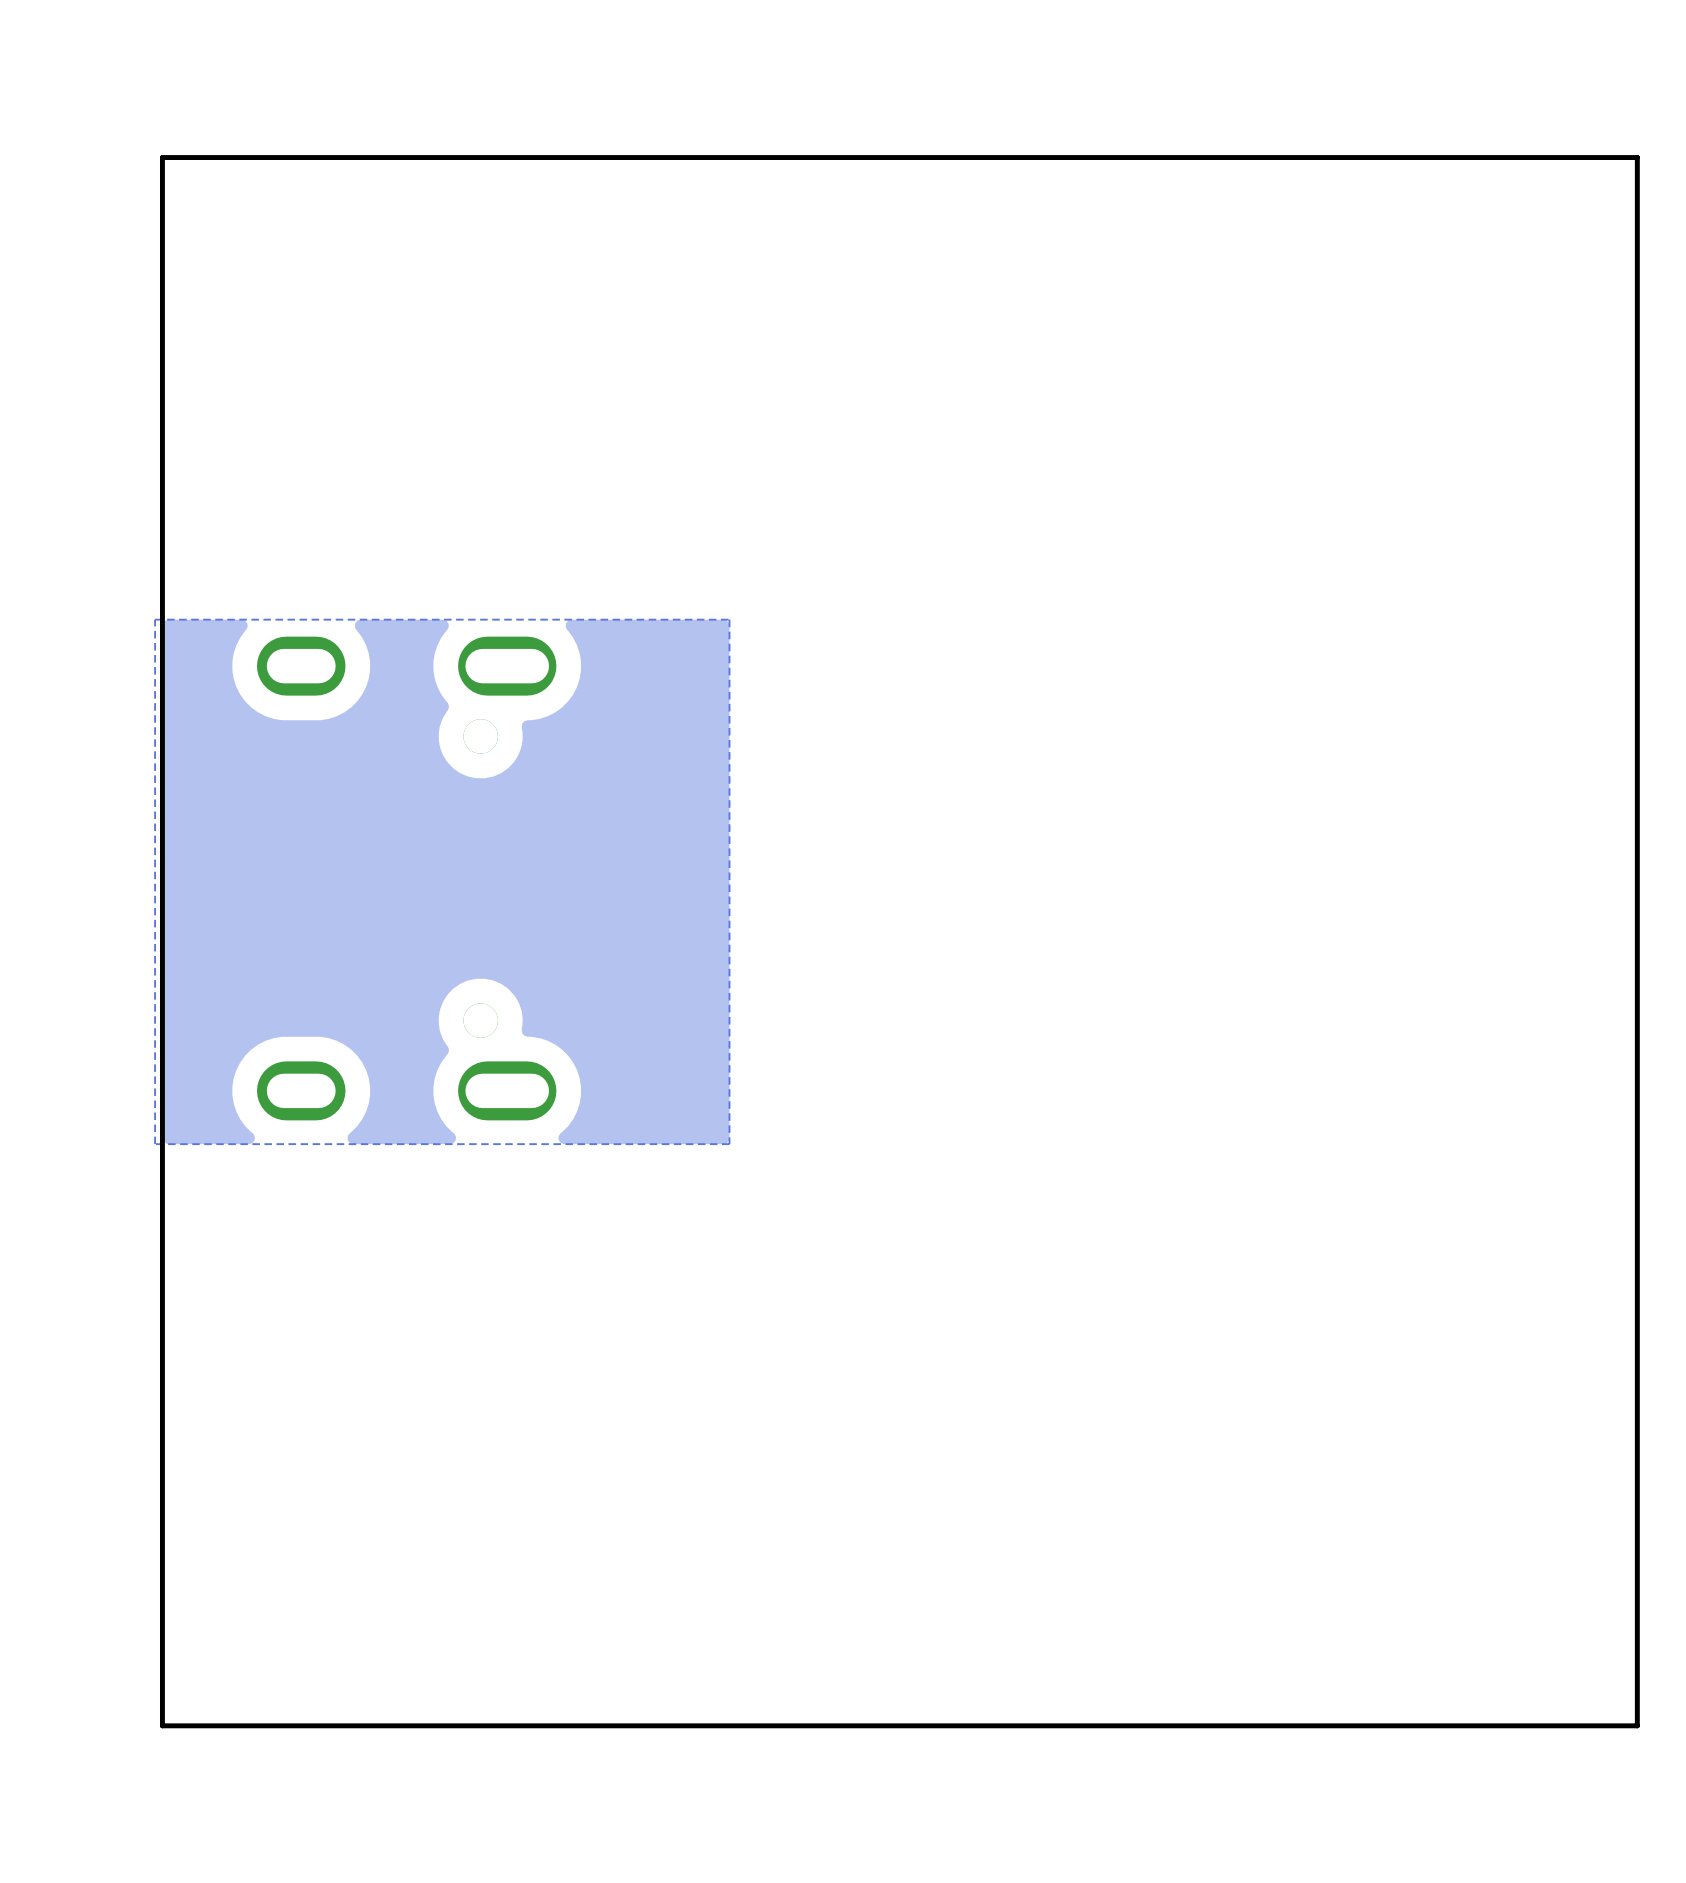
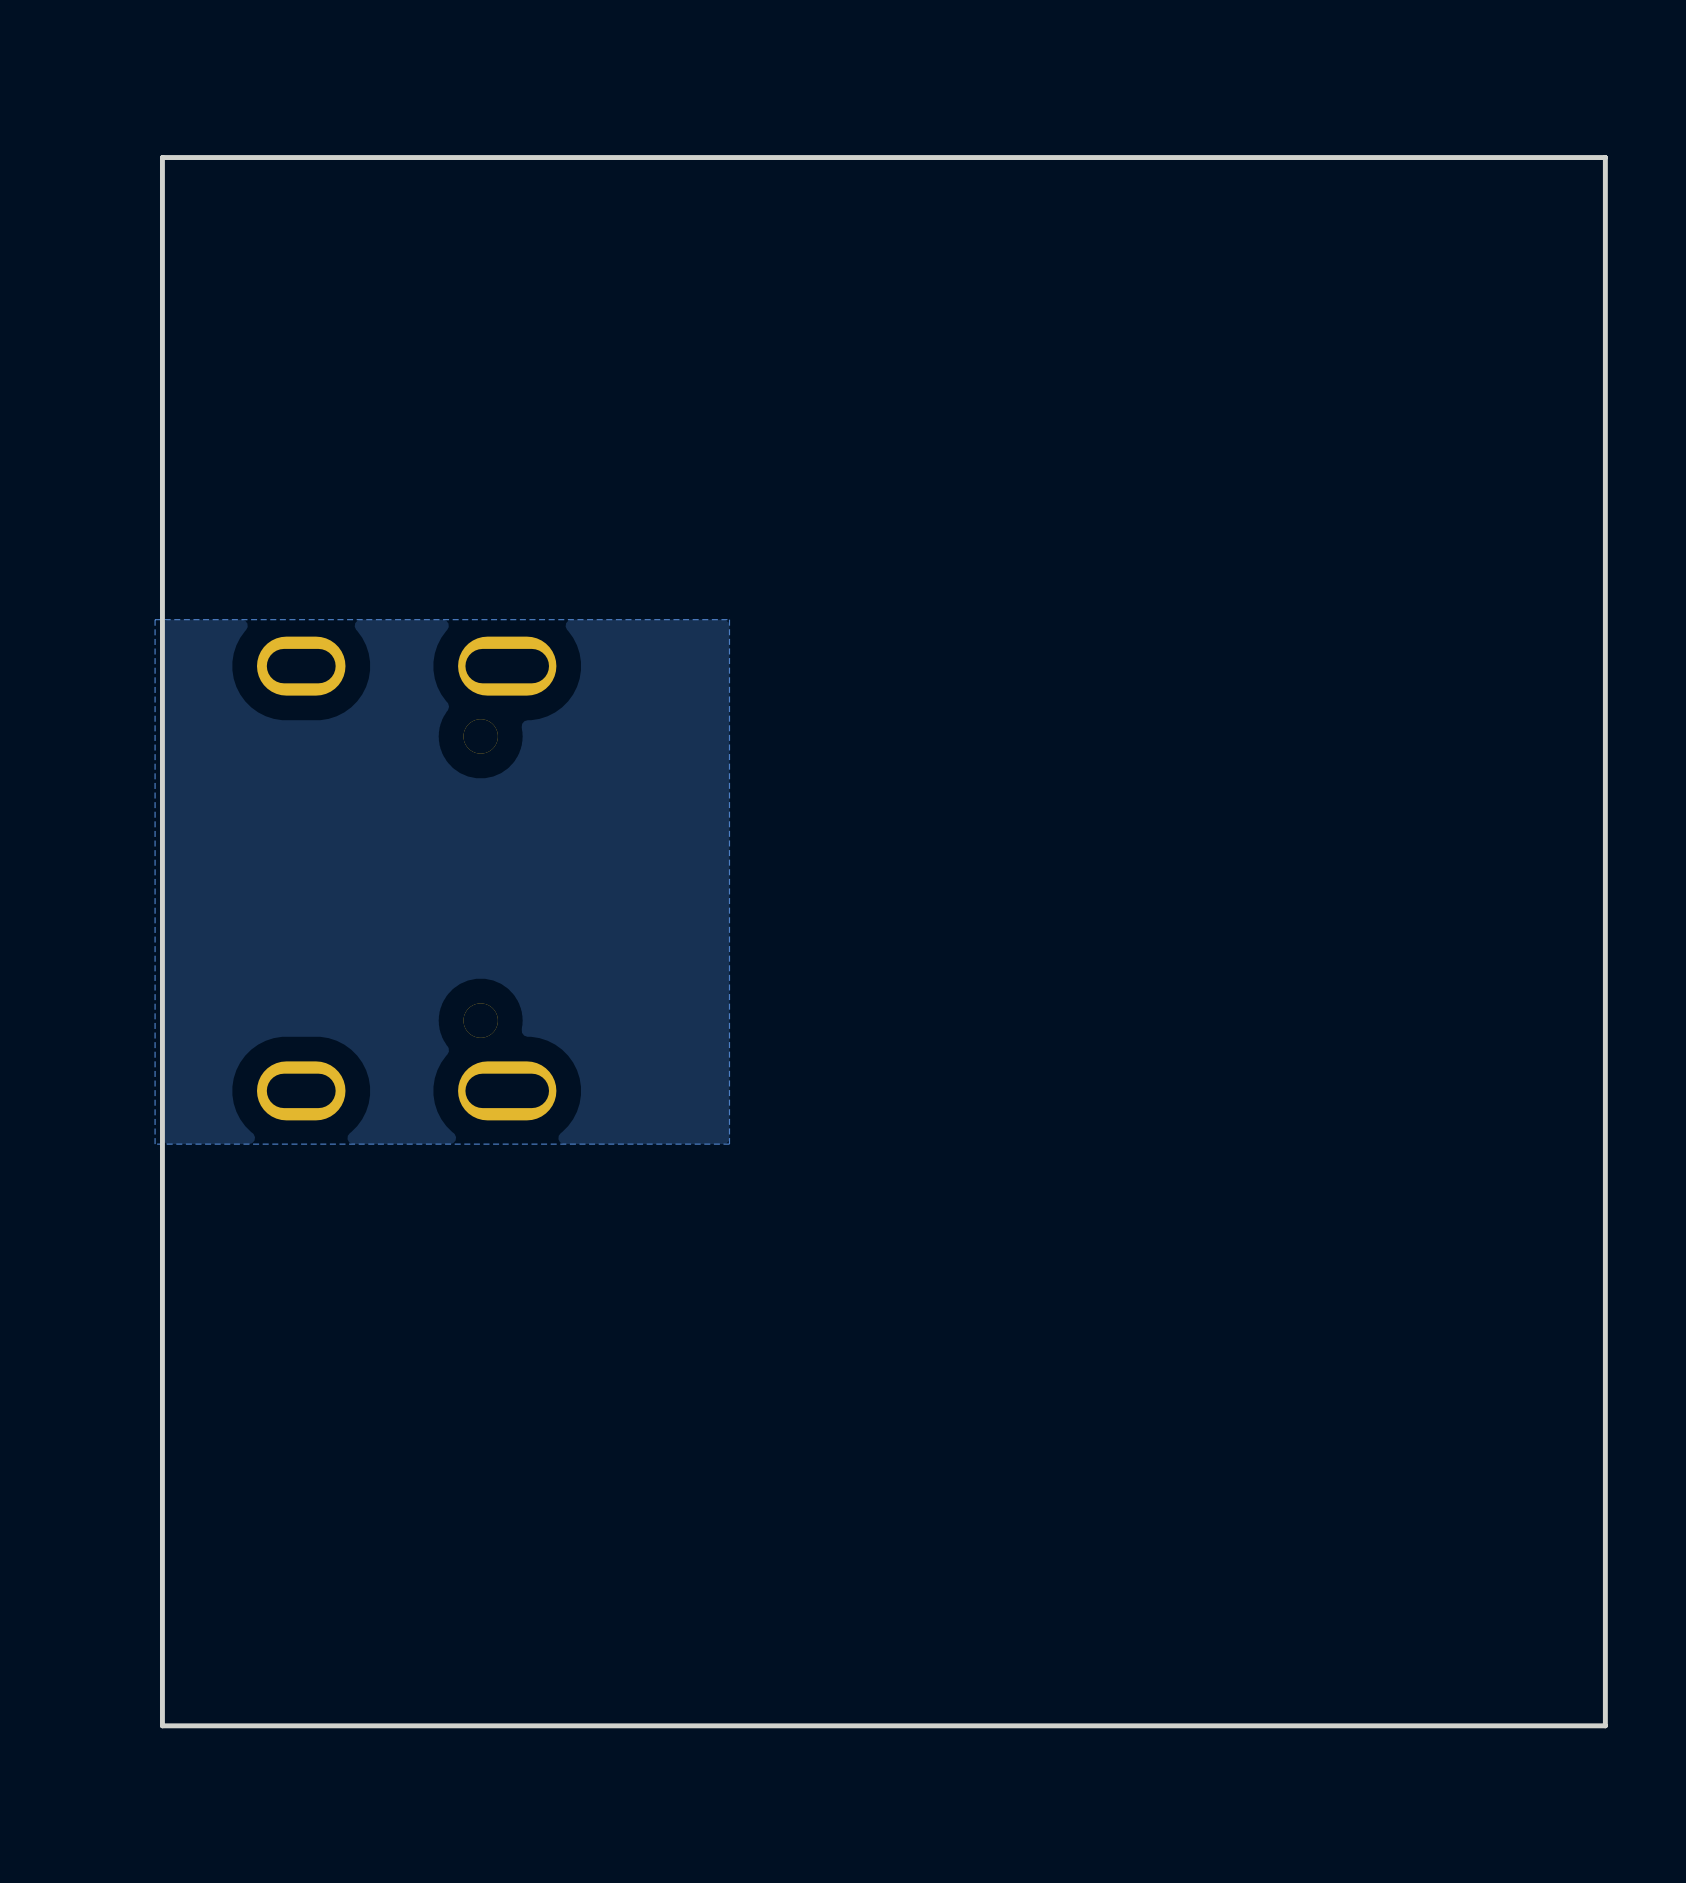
board edge: (1605, 157) (1637, 157) (1637, 1725) (1605, 1725) -> (1605, 157) (1605, 1725)

